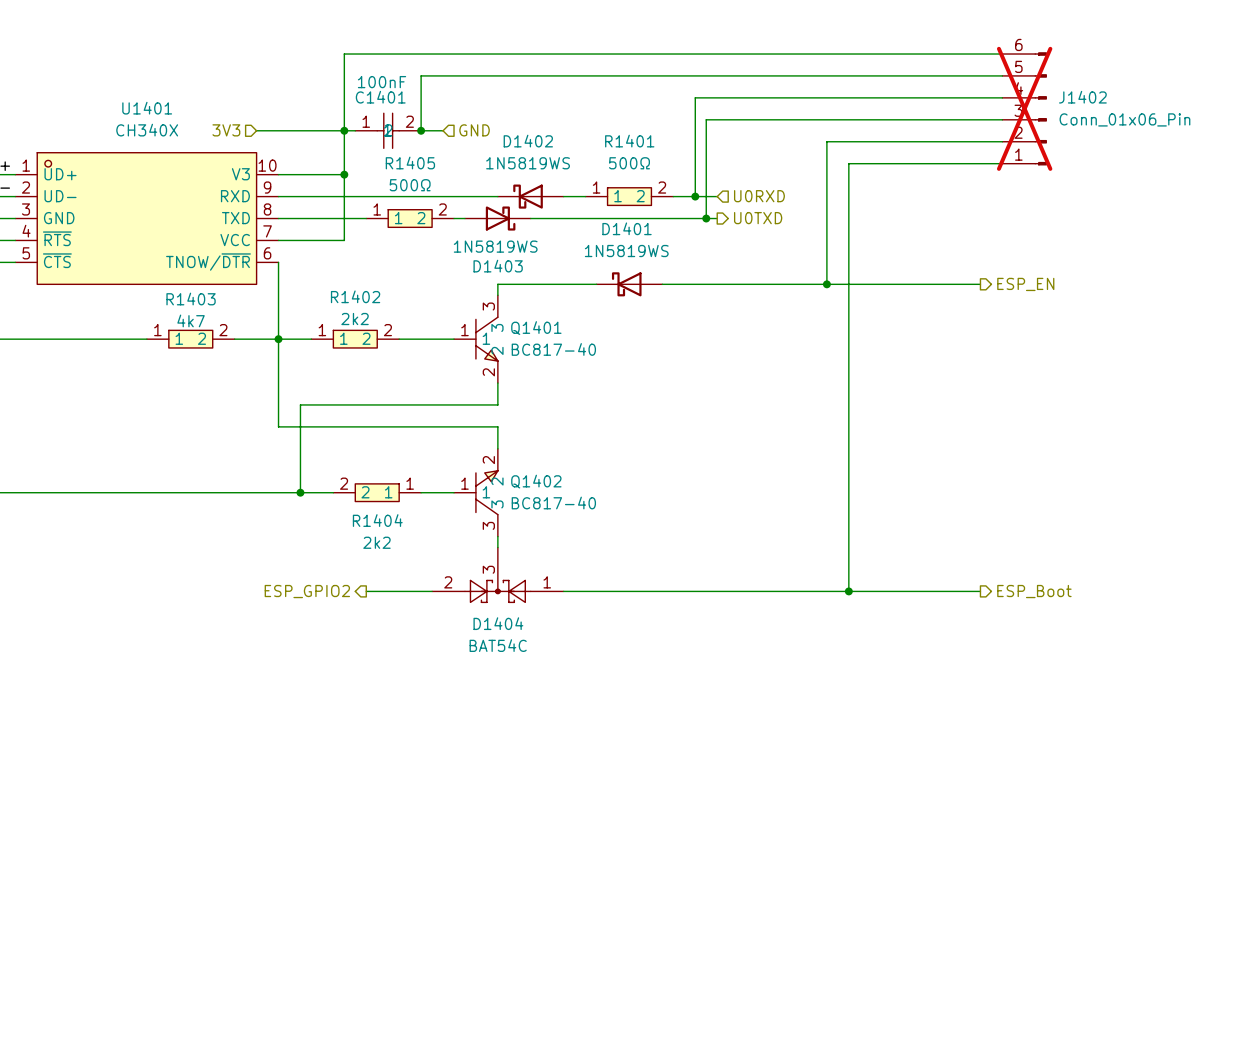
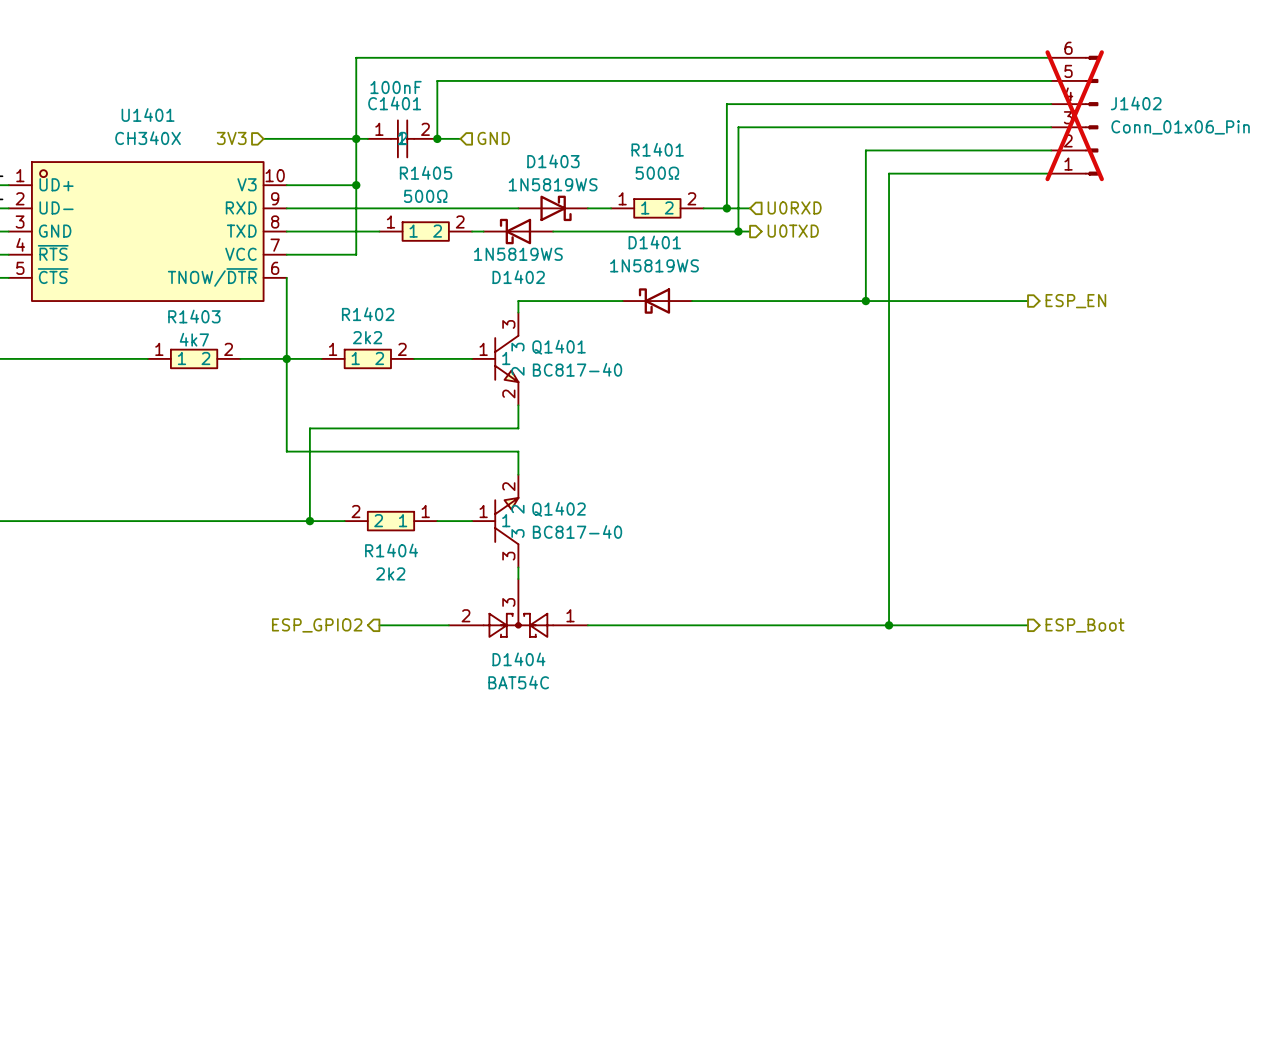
D1402 name position: D1402 (528, 141) -> D1402 (518, 277)
D1402 value position: 1N5819WS (528, 163) -> 1N5819WS (518, 254)
D1402 position: (530, 196) -> (518, 231)
D1403 position: (497, 218) -> (553, 208)
D1403 value position: 1N5819WS (495, 246) -> 1N5819WS (553, 184)
D1403 name position: D1403 (498, 266) -> D1403 (553, 161)

